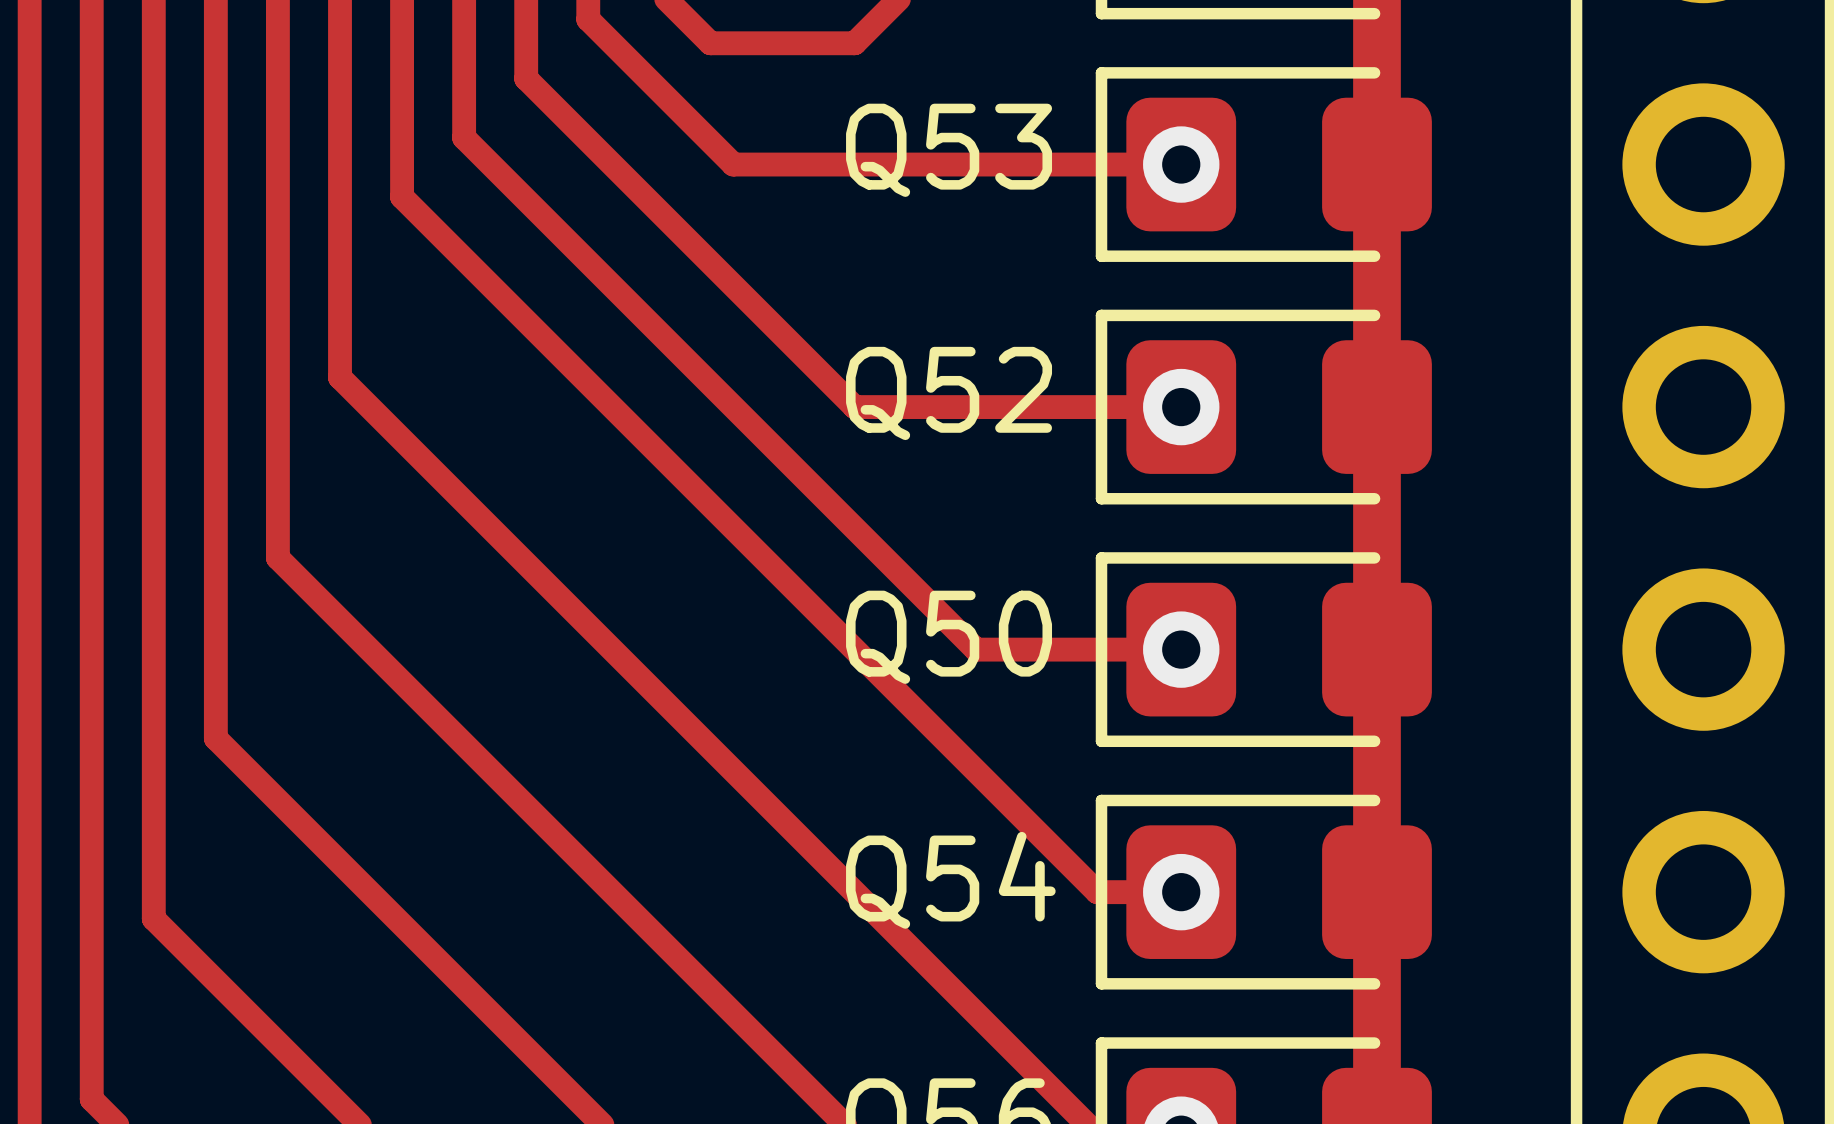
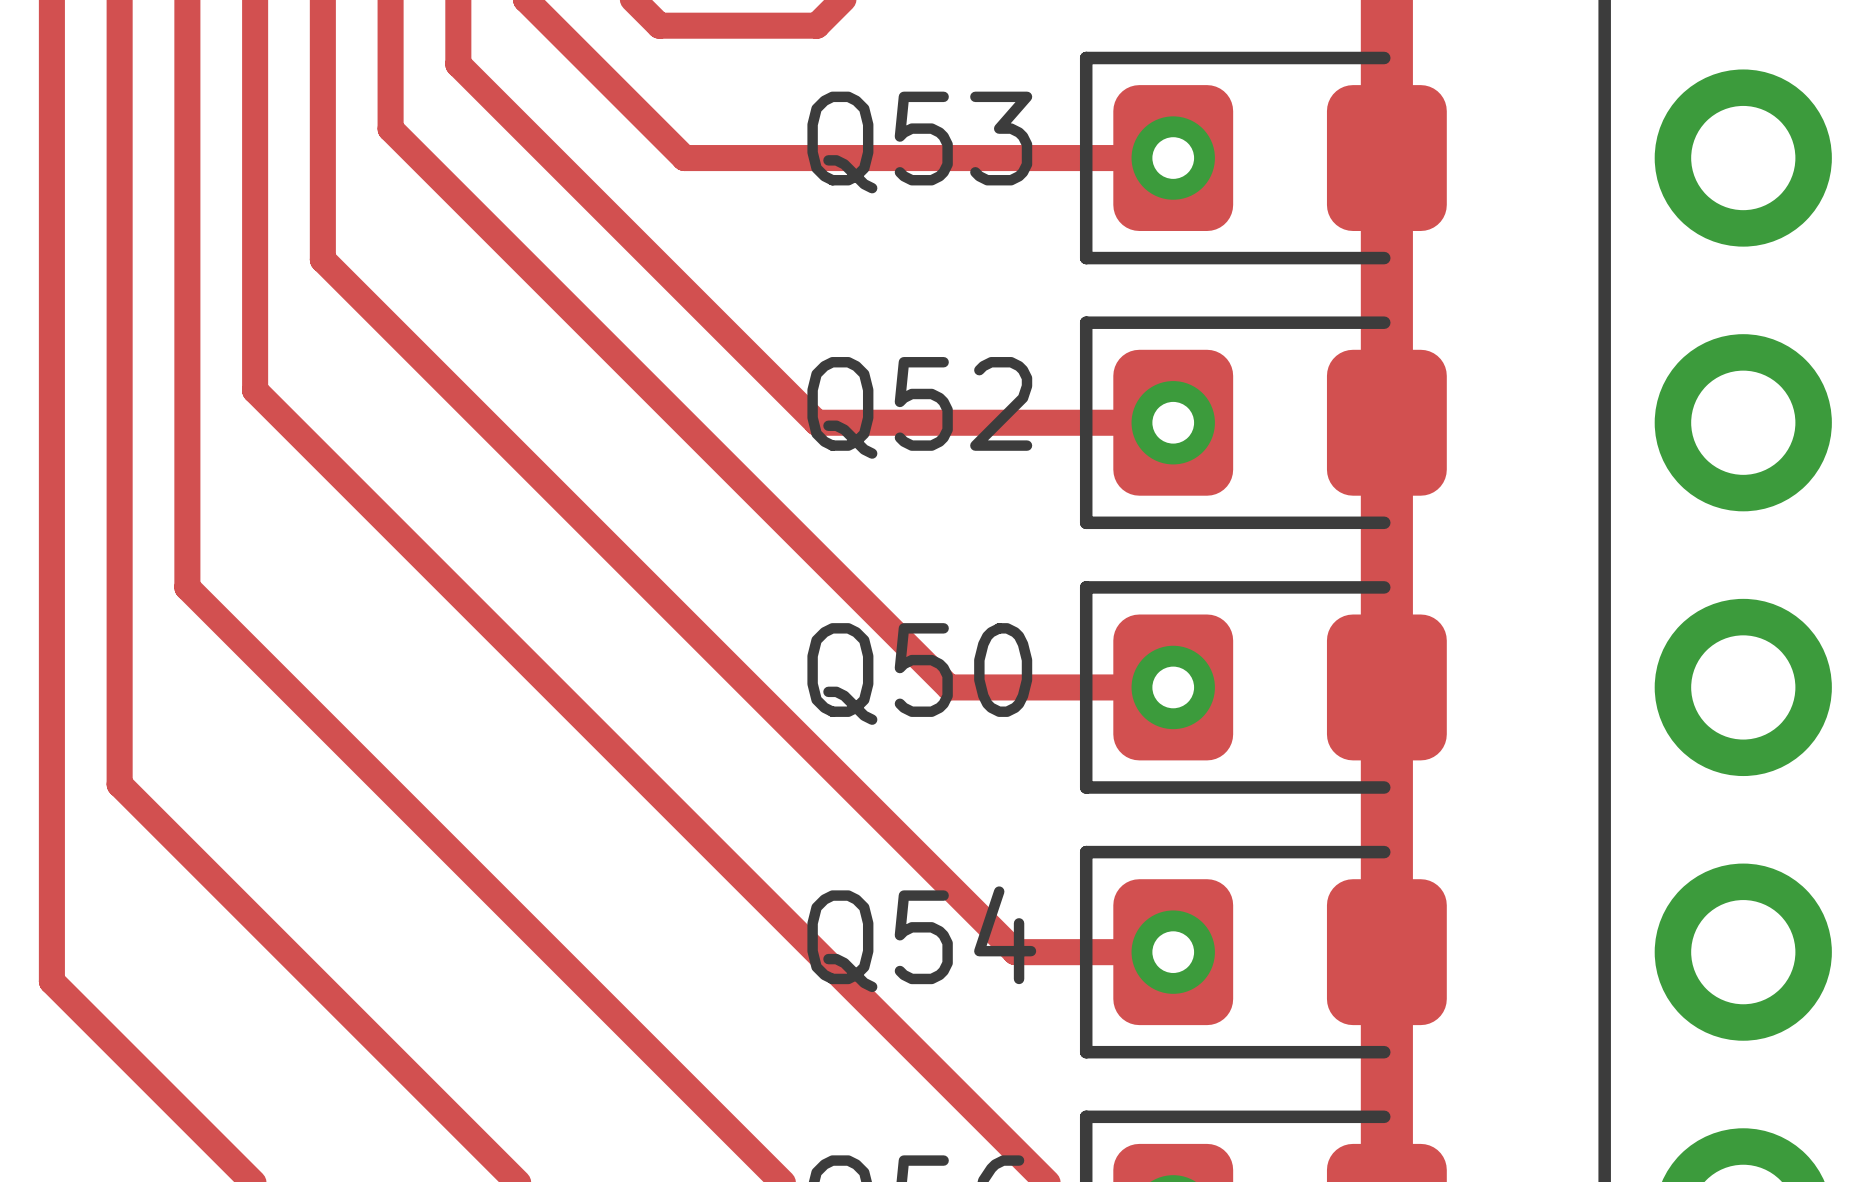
track: (402, 197) (1097, 892) -> (322, 193) (322, 259) (1015, 952) (1081, 952)

